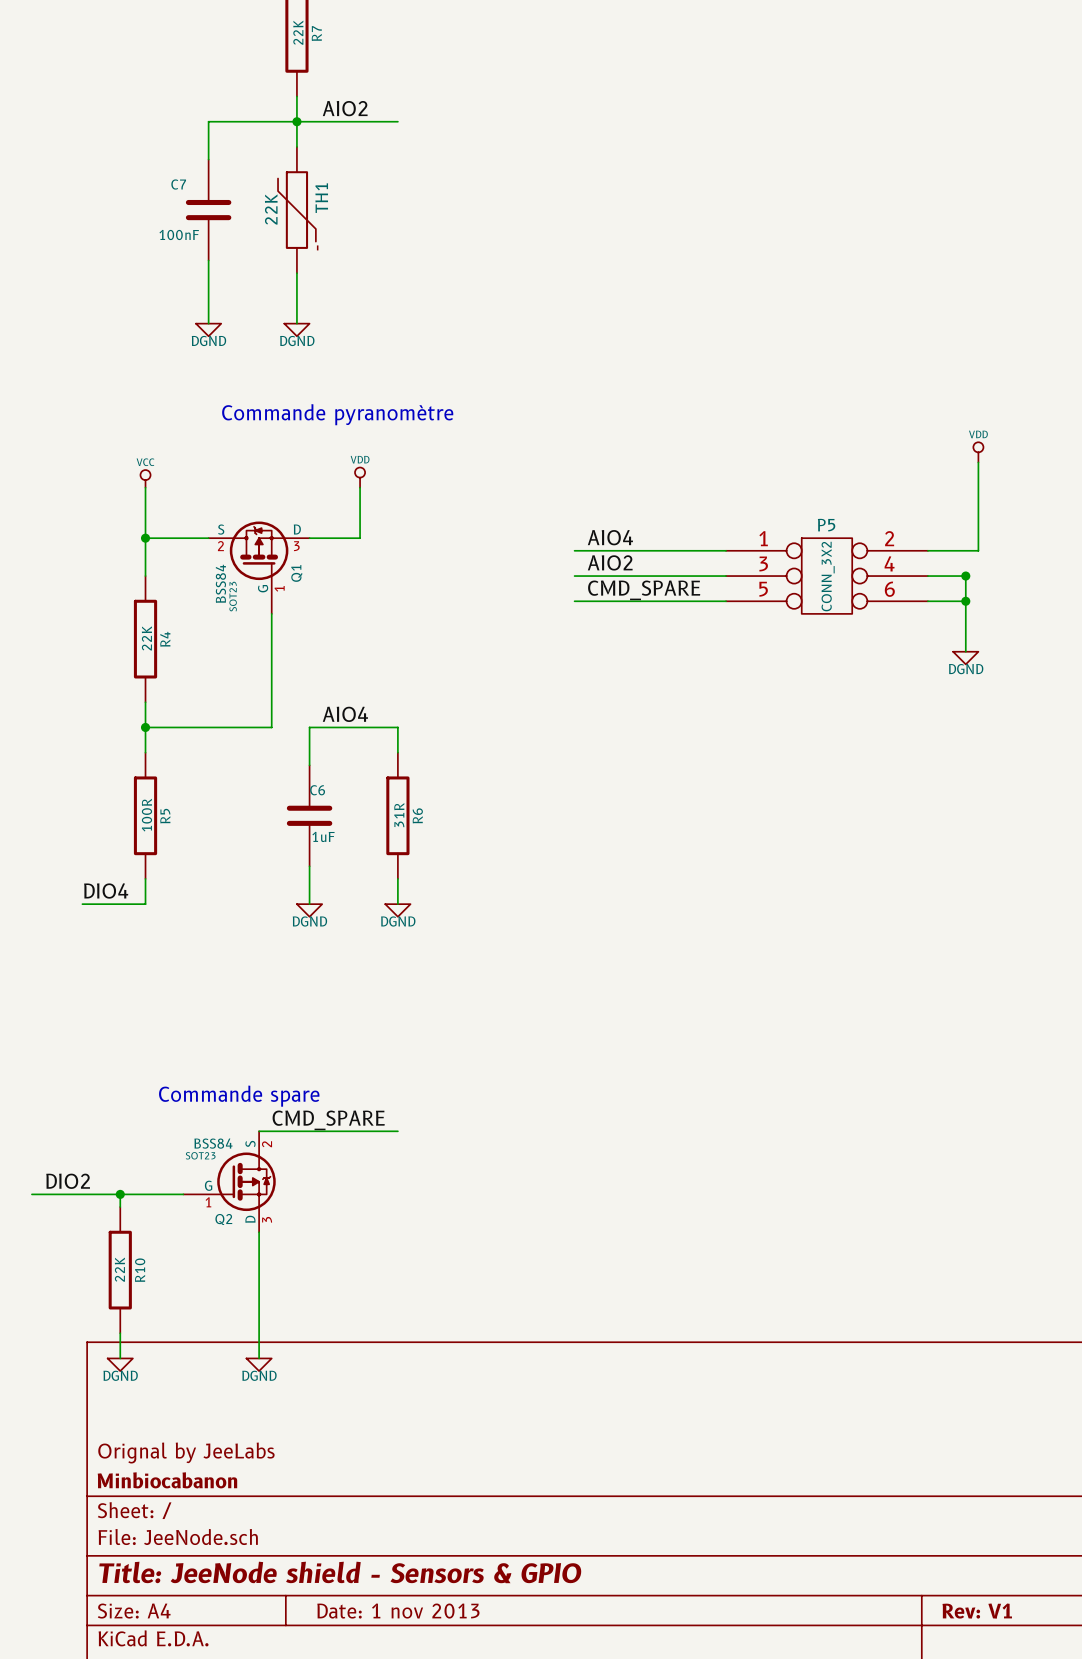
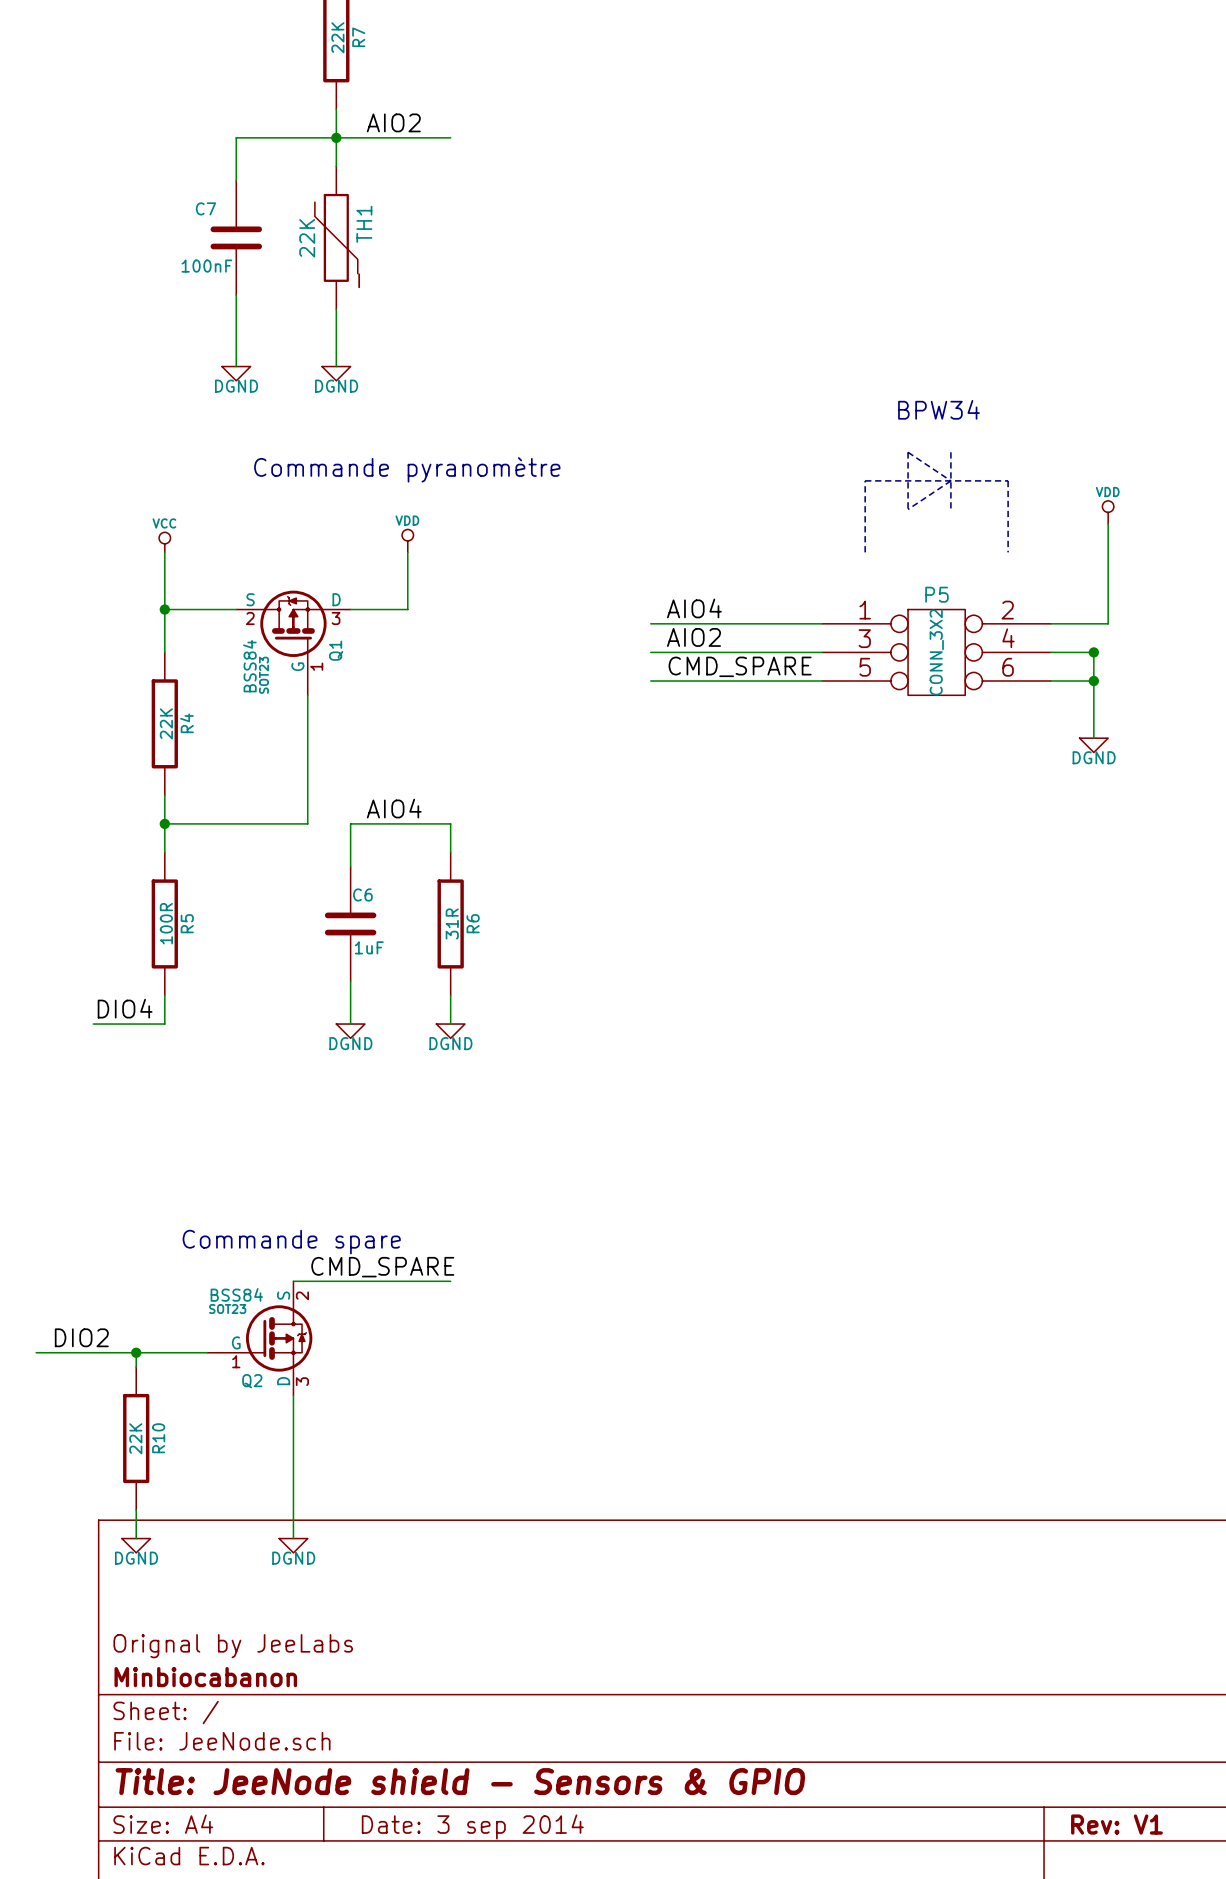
text: none -> BPW34 (938, 409)
line: none -> (908, 452) (908, 509) (950, 480) (908, 452)
line: none -> (950, 452) (950, 509)
line: none -> (865, 552) (865, 480) (1008, 480) (1008, 552)
title block: Date: 1 nov 2013 (398, 1611) -> Date: 3 sep 2014 (472, 1826)

